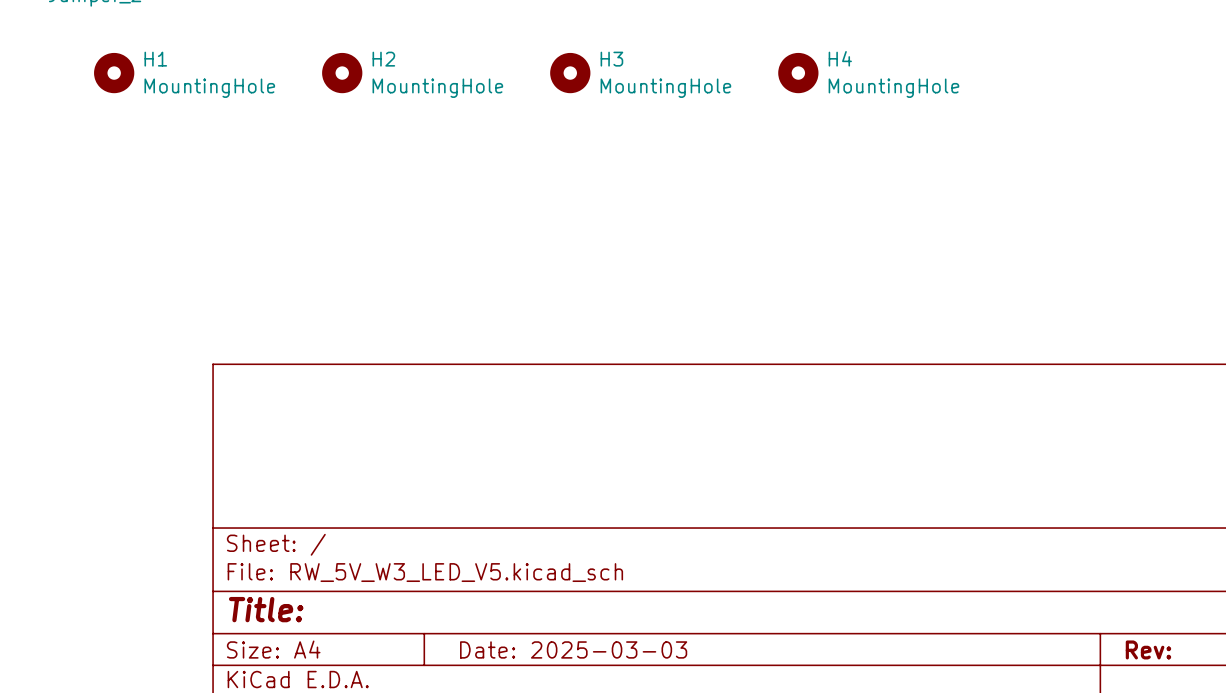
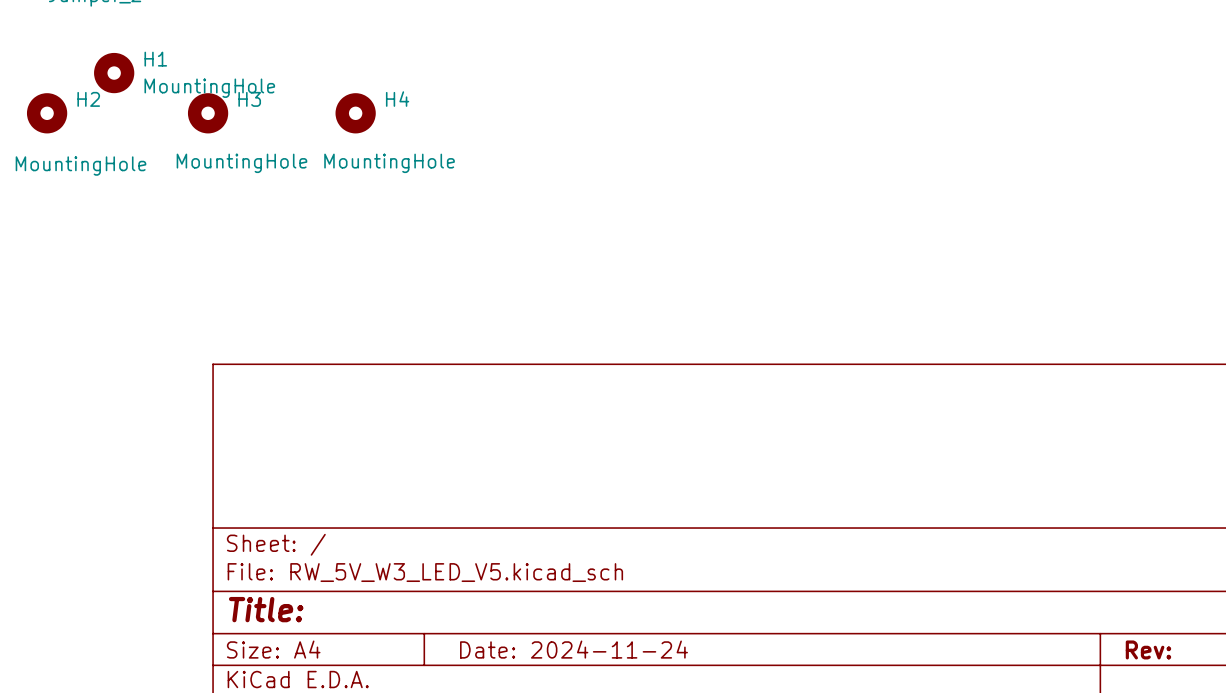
H2 position: (342, 73) -> (47, 113)
H3 position: (570, 73) -> (208, 113)
H4 position: (798, 73) -> (355, 113)
H2 value position: MountingHole (437, 88) -> MountingHole (80, 166)
H3 value position: MountingHole (665, 88) -> MountingHole (241, 163)
H4 value position: MountingHole (893, 88) -> MountingHole (389, 163)
title block: Date: 2025-03-03 (573, 649) -> Date: 2024-11-24 (574, 649)

